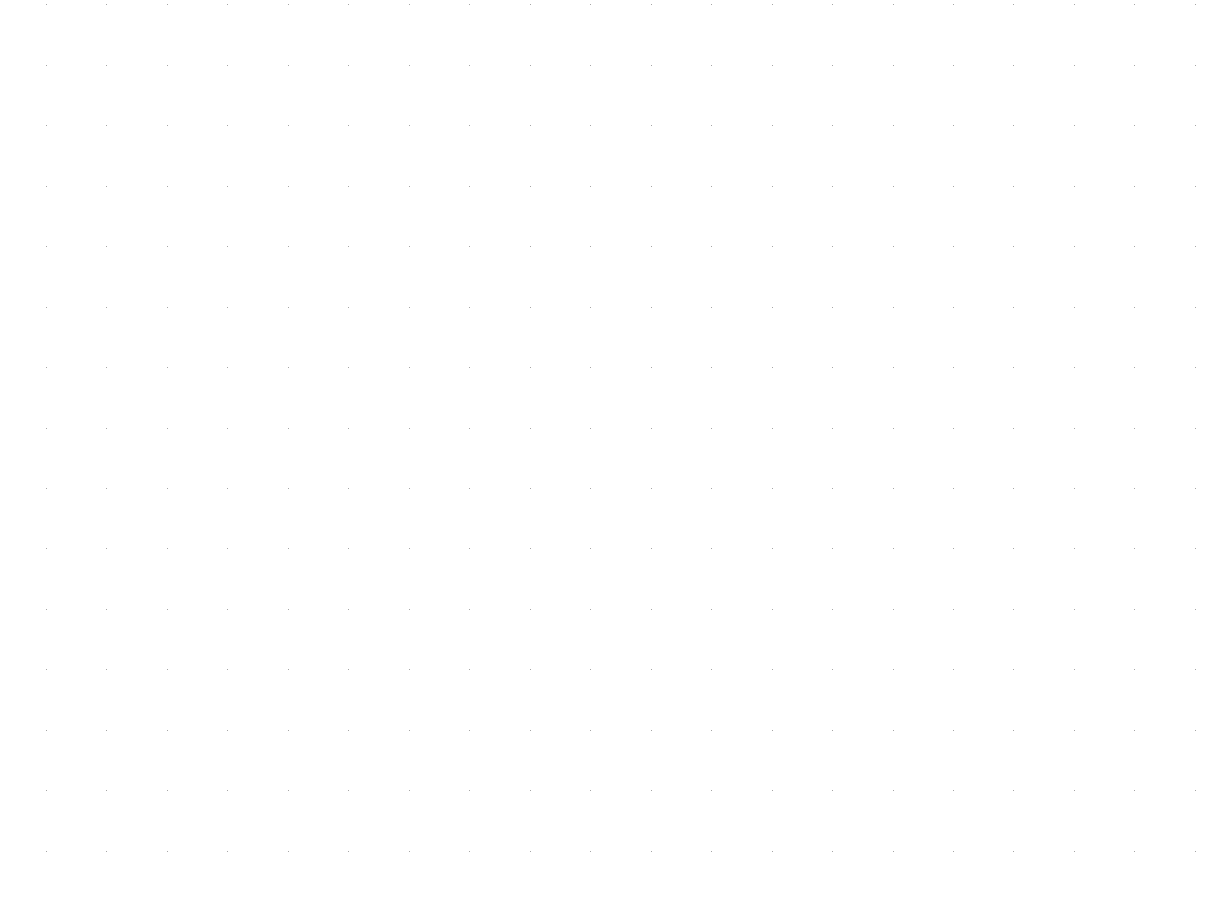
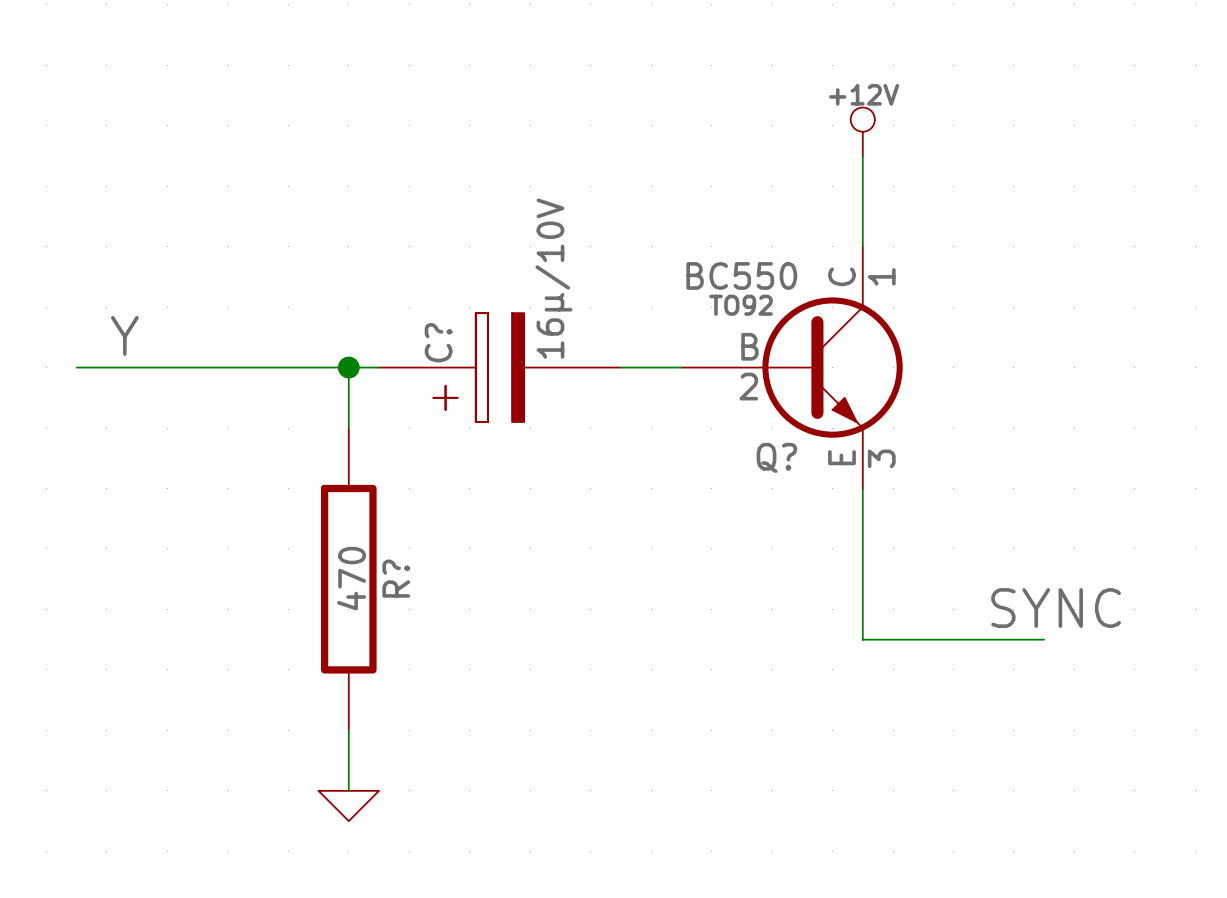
power symbol: none -> +12V (862, 131)
wire: none -> (862, 155) (862, 246)
label: none -> Y (124, 335)
wire: none -> (76, 367) (379, 367)
wire: none -> (348, 367) (348, 428)
junction: none -> (348, 367)
C?: none -> 16µ/10V (499, 367)
wire: none -> (620, 367) (681, 367)
Q?: none -> BC550 (792, 367)
wire: none -> (862, 488) (862, 639) (1044, 639)
R?: none -> 470 (348, 579)
label: none -> SYNC (1056, 608)
wire: none -> (348, 730) (348, 790)
power symbol: none -> (348, 805)

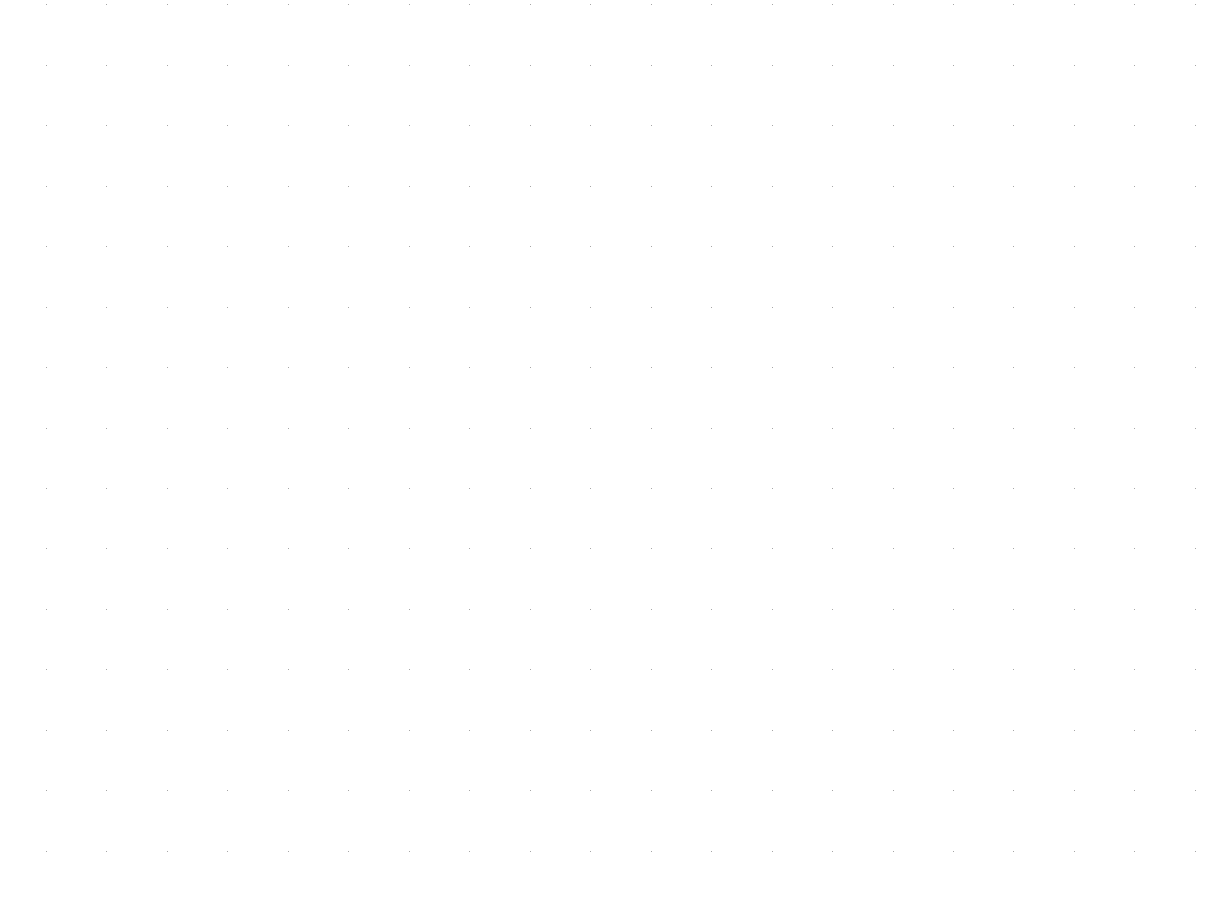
power symbol: +12V (862, 131) -> none
wire: (862, 155) (862, 246) -> none
label: Y (124, 335) -> none
wire: (76, 367) (379, 367) -> none
wire: (348, 367) (348, 428) -> none
junction: (348, 367) -> none
C?: 16µ/10V (499, 367) -> none
wire: (620, 367) (681, 367) -> none
Q?: BC550 (792, 367) -> none
wire: (862, 488) (862, 639) (1044, 639) -> none
R?: 470 (348, 579) -> none
label: SYNC (1056, 608) -> none
wire: (348, 730) (348, 790) -> none
power symbol: (348, 805) -> none

